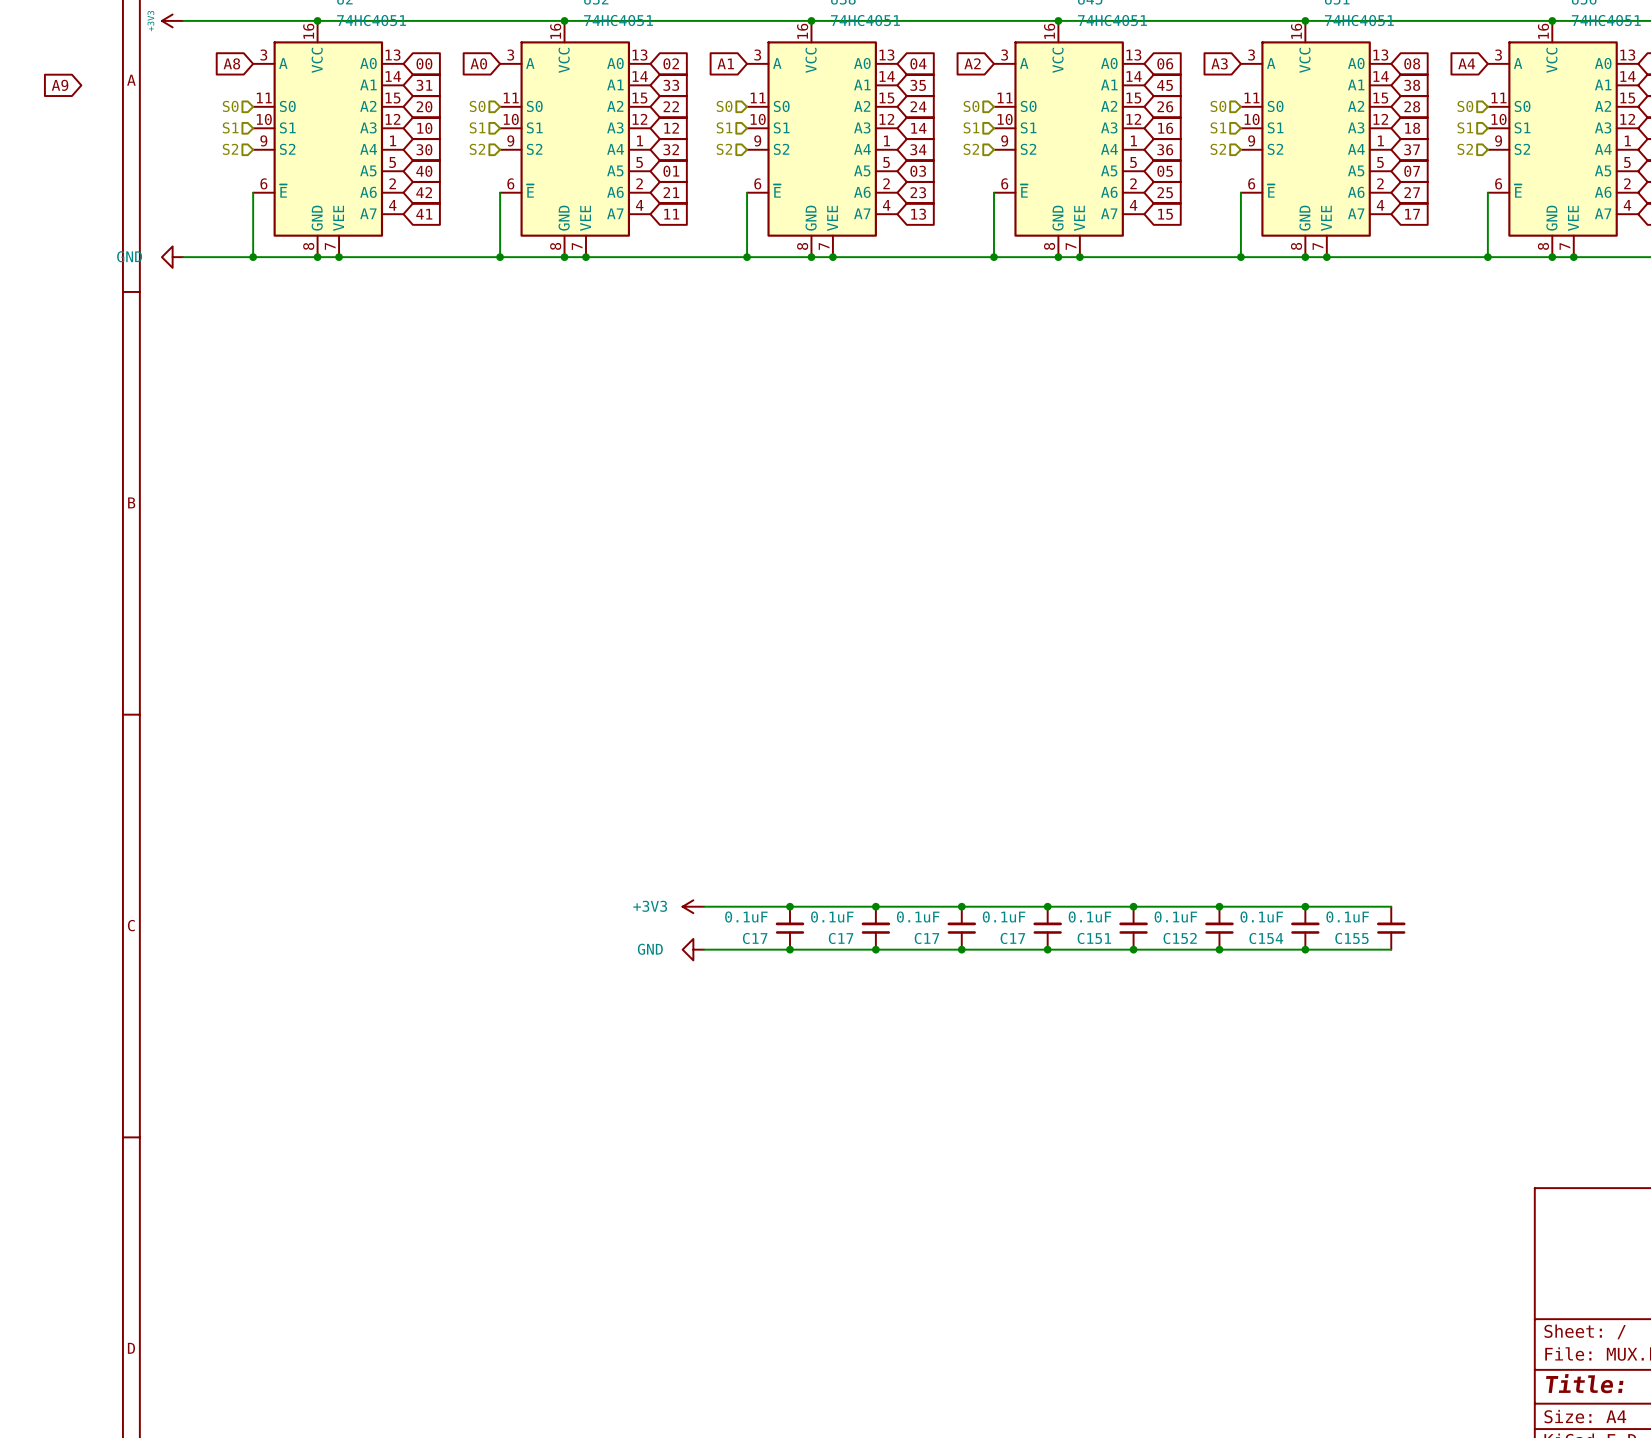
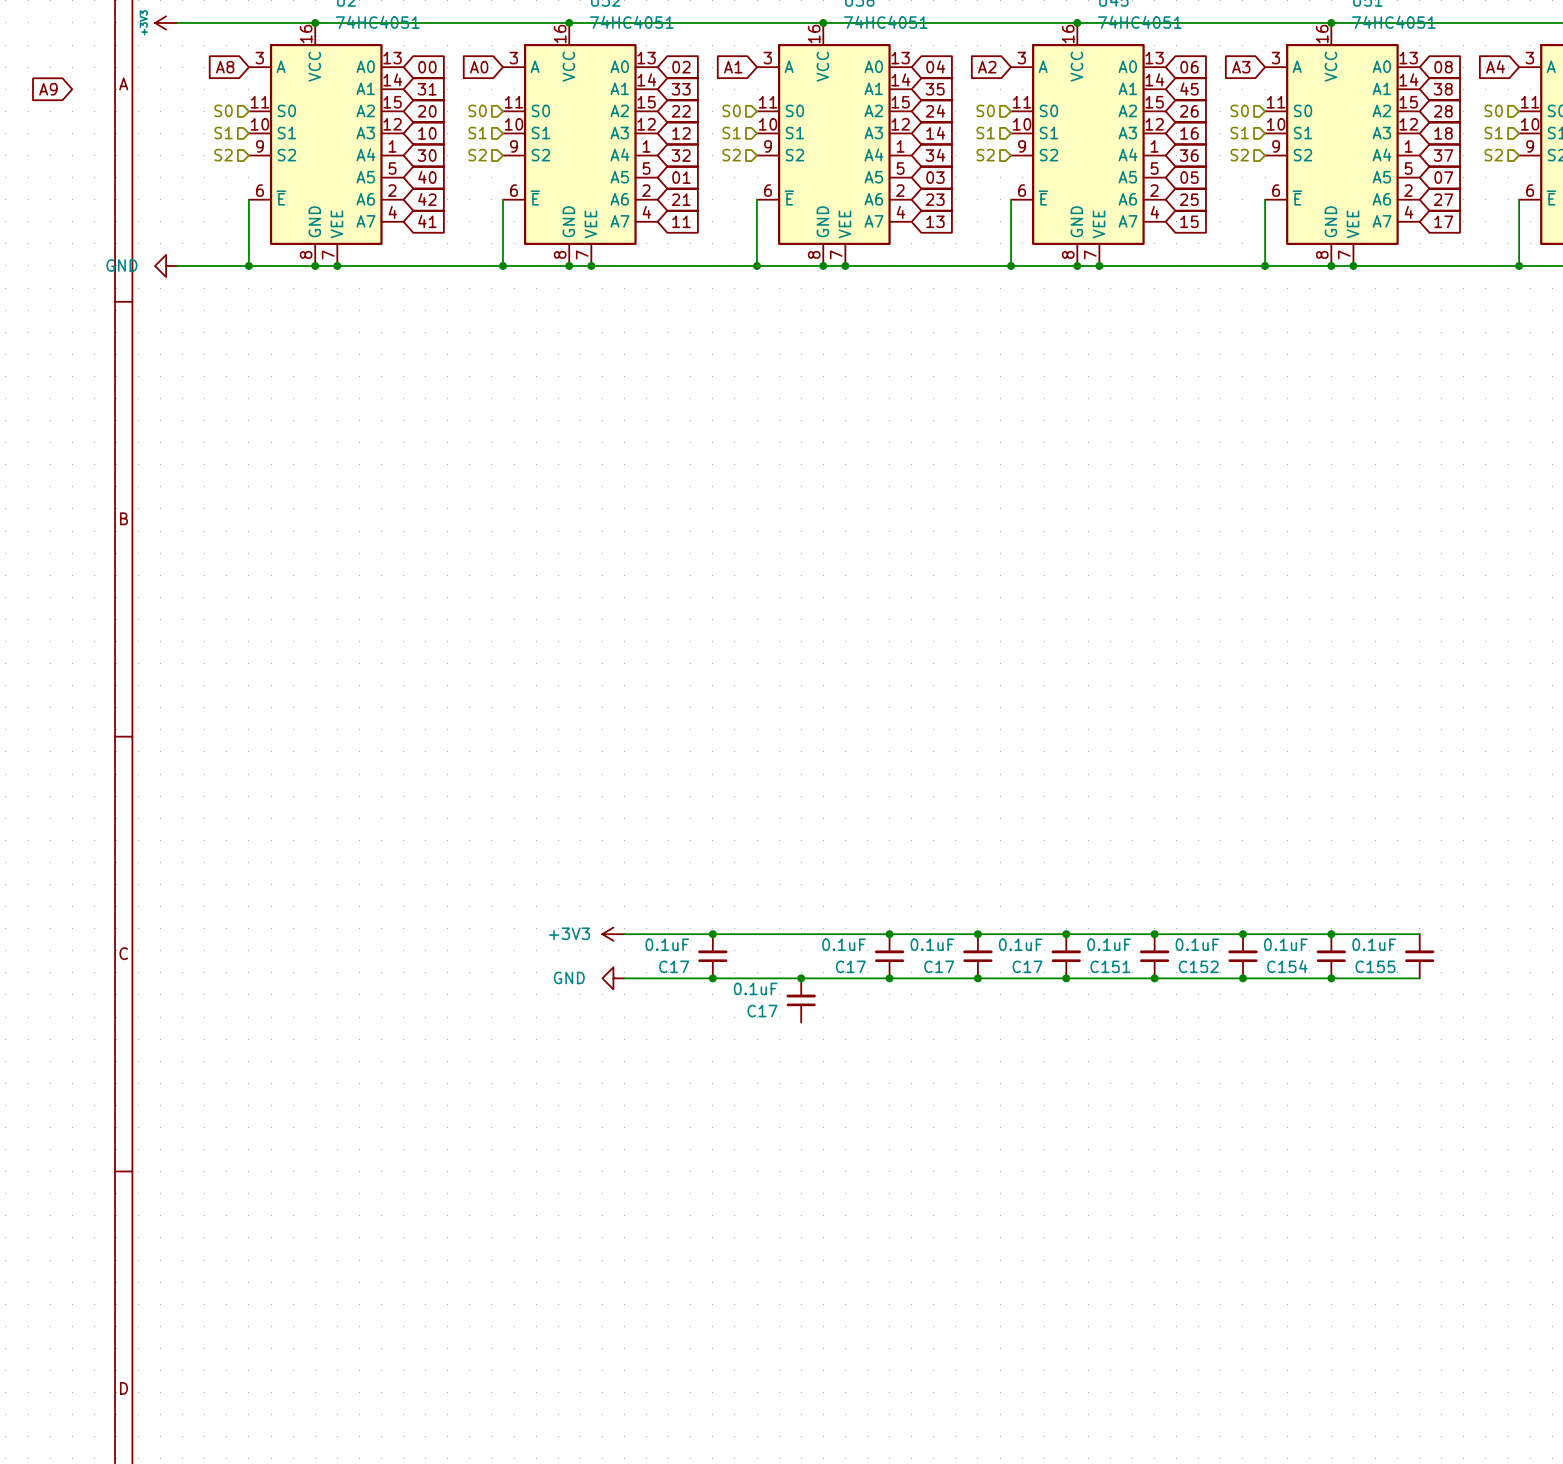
wire: none -> (624, 934) (712, 934)
power symbol position: +3V3 (693, 906) -> +3V3 (613, 934)
junction: none -> (712, 934)
junction: (789, 906) -> none
C17: none -> 0.1uF (712, 956)
C17: 0.1uF (789, 928) -> none
wire: none -> (624, 978) (712, 978)
power symbol position: GND (693, 949) -> GND (613, 978)
junction: none -> (712, 978)
C17: none -> 0.1uF (801, 1000)

